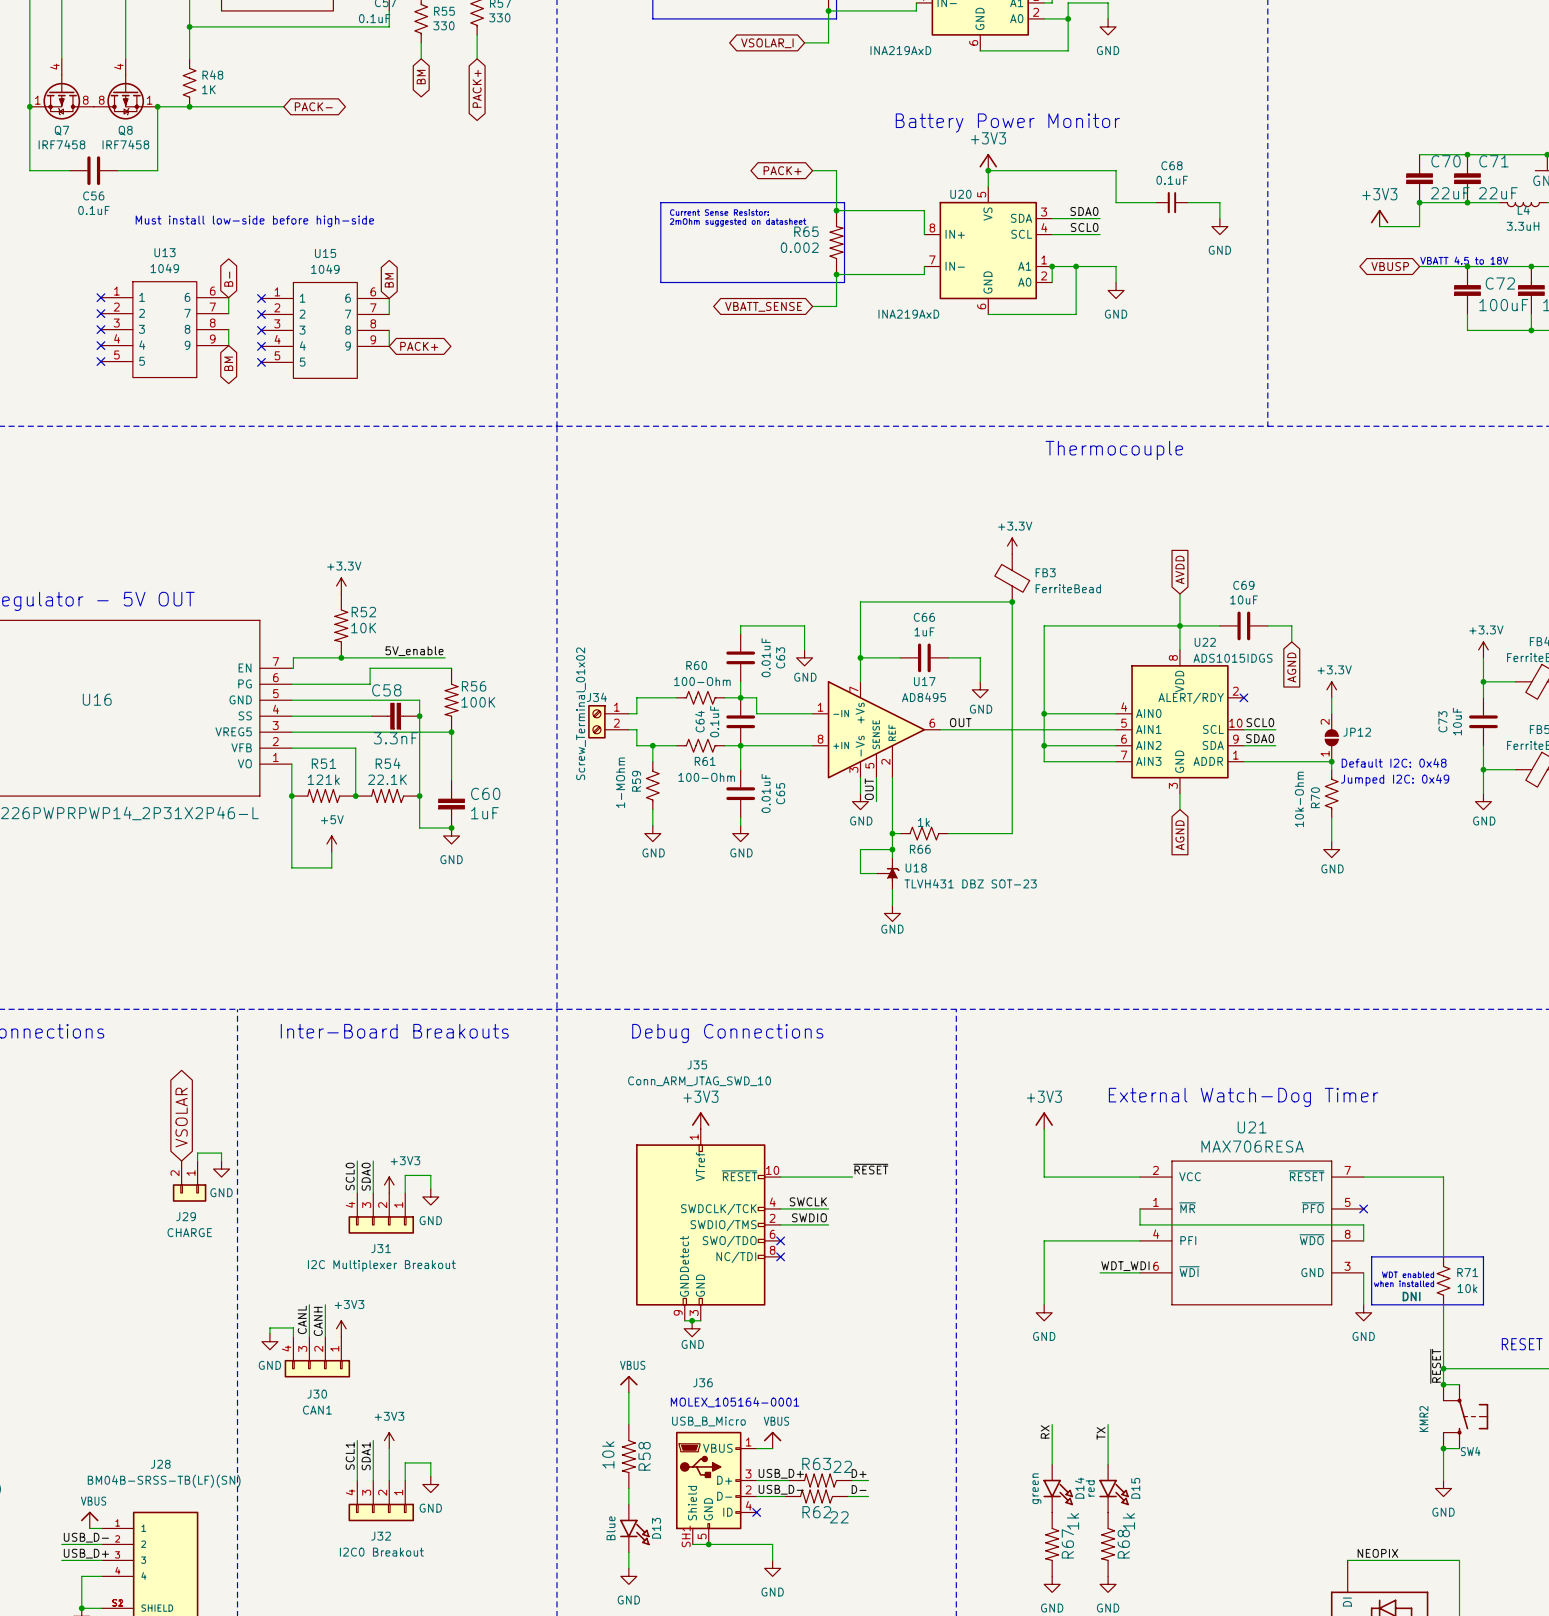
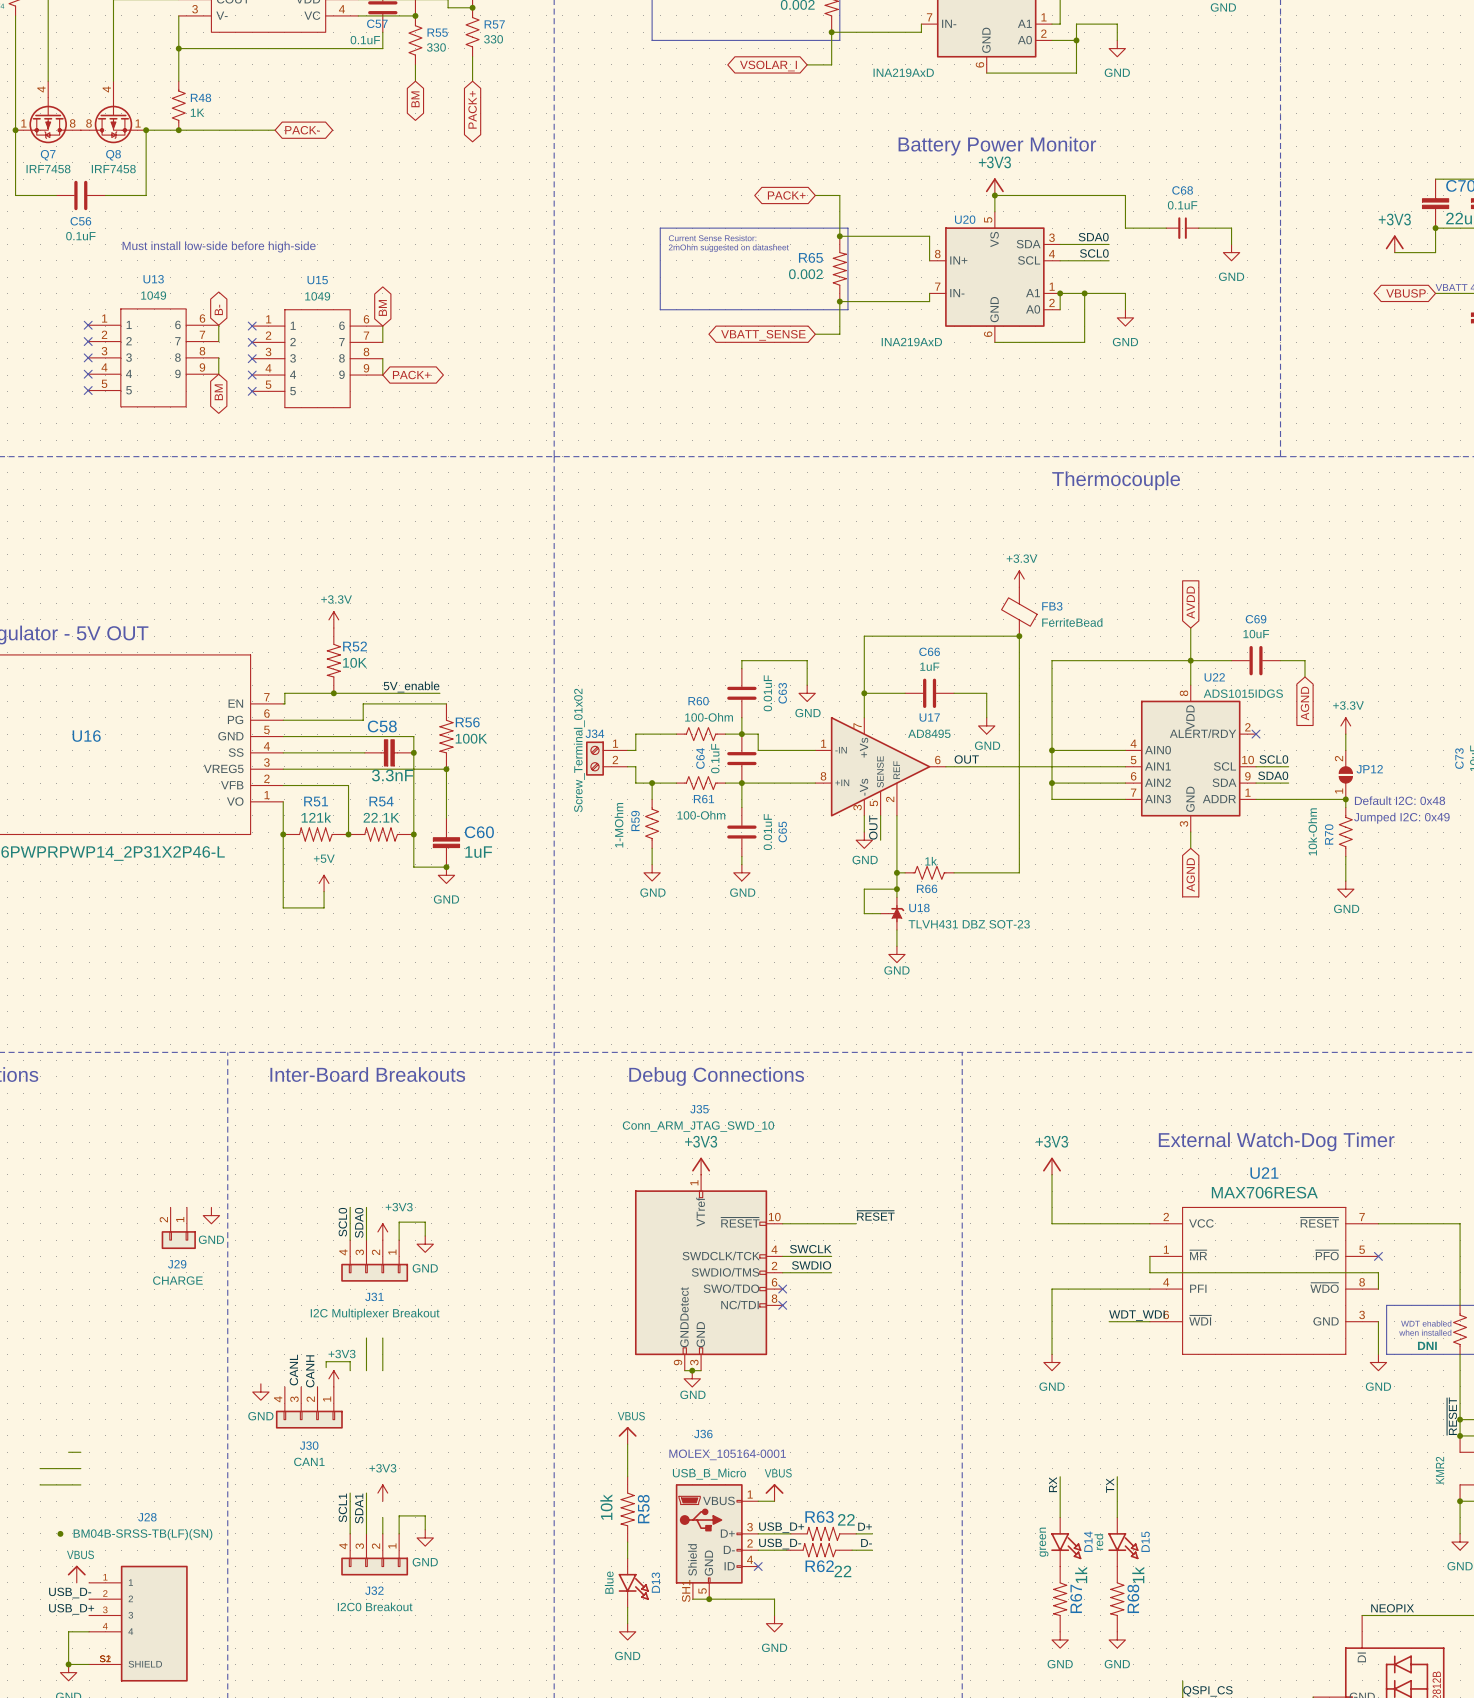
global label: VSOLAR (181, 1117) -> none
wire: (197, 1161) (197, 1153) (221, 1153) (221, 1161) -> none
wire: (309, 1304) (309, 1336) -> (366, 1338) (366, 1370)
wire: (325, 1304) (325, 1336) -> (382, 1338) (382, 1370)
wire: (269, 1333) (269, 1327) (293, 1327) (293, 1336) -> (326, 1367) (326, 1361) (350, 1361) (350, 1370)
wire: (389, 1448) (389, 1464) -> none
junction: none -> (60, 1533)
wire: (89, 1528) (101, 1528) -> (68, 1452) (80, 1452)
wire: (61, 1544) (101, 1544) -> (40, 1484) (80, 1484)
wire: (61, 1560) (101, 1560) -> (40, 1468) (80, 1468)

